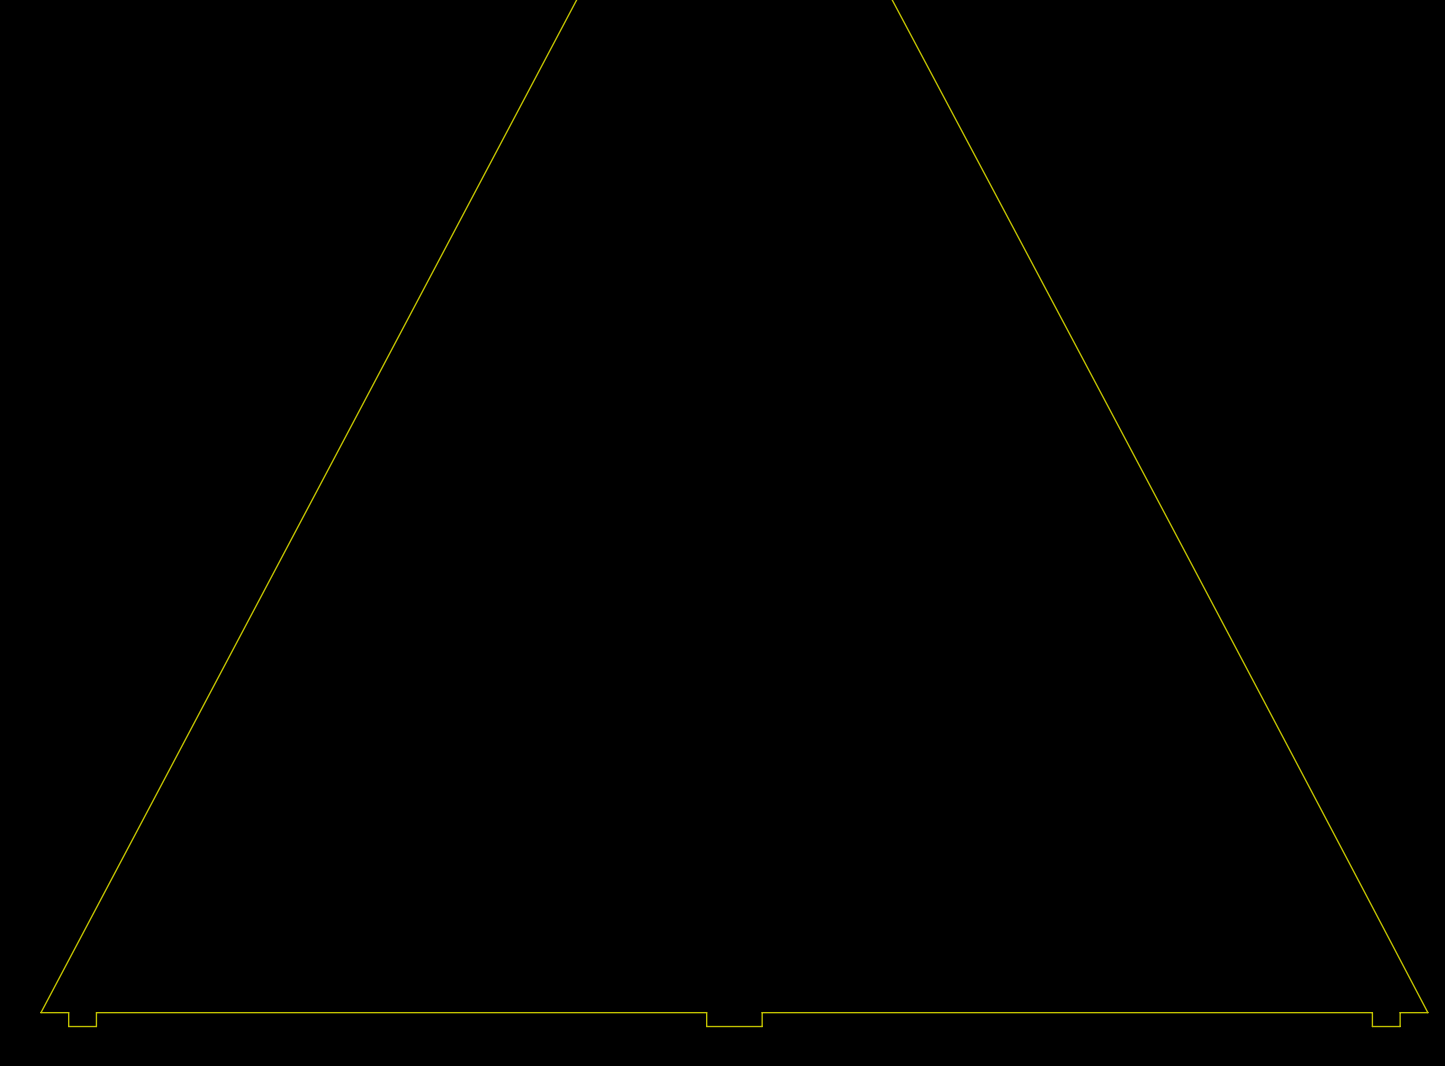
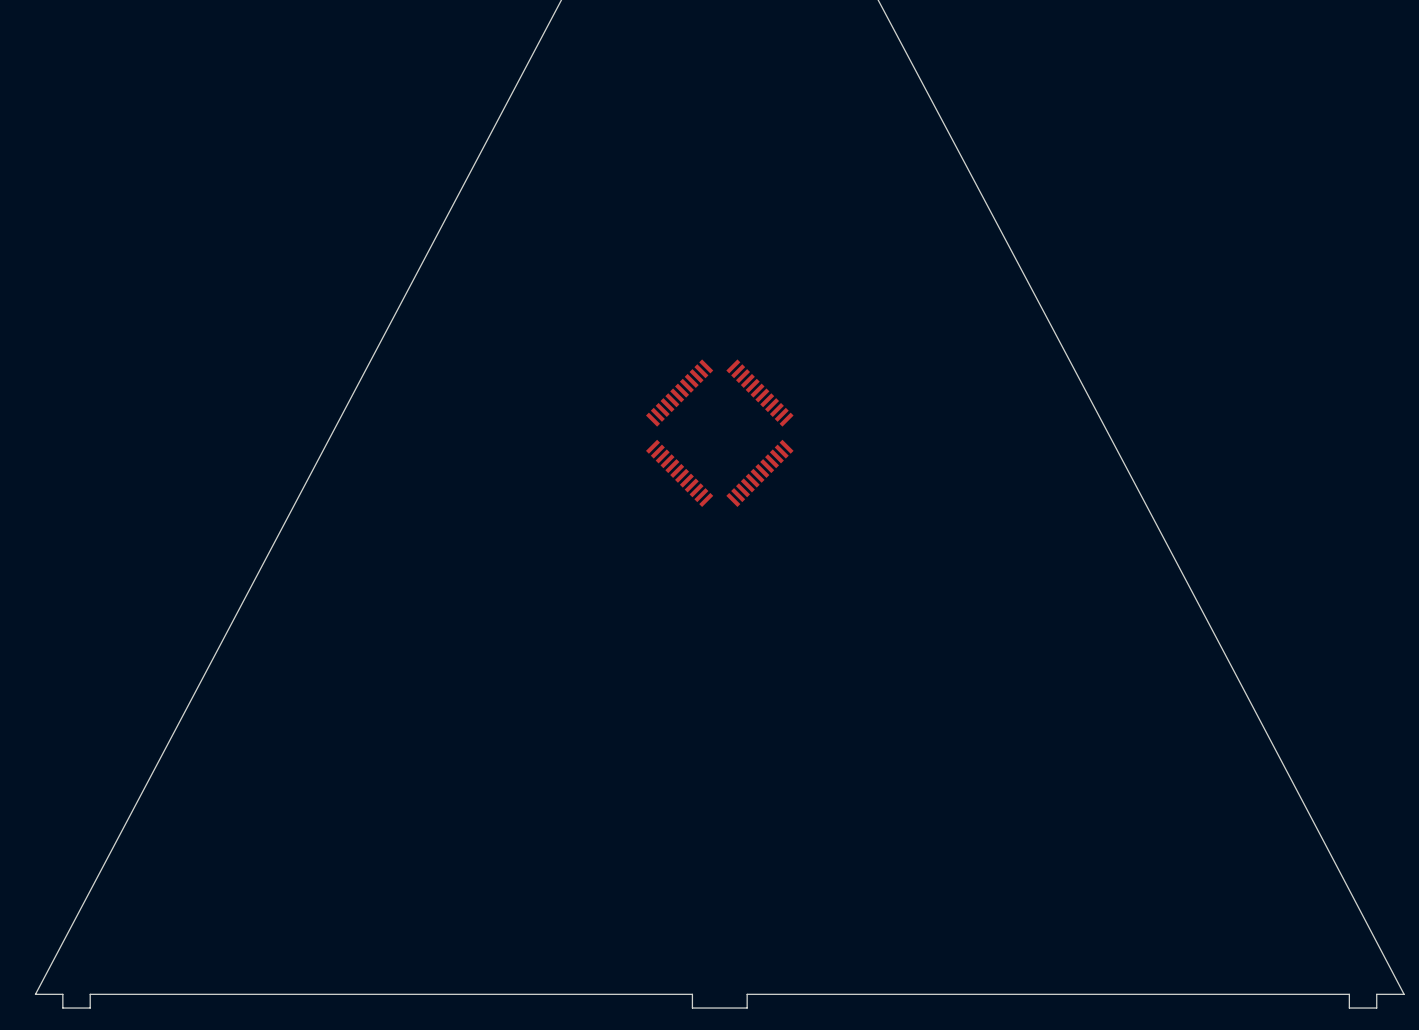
part: none -> (719, 433)

